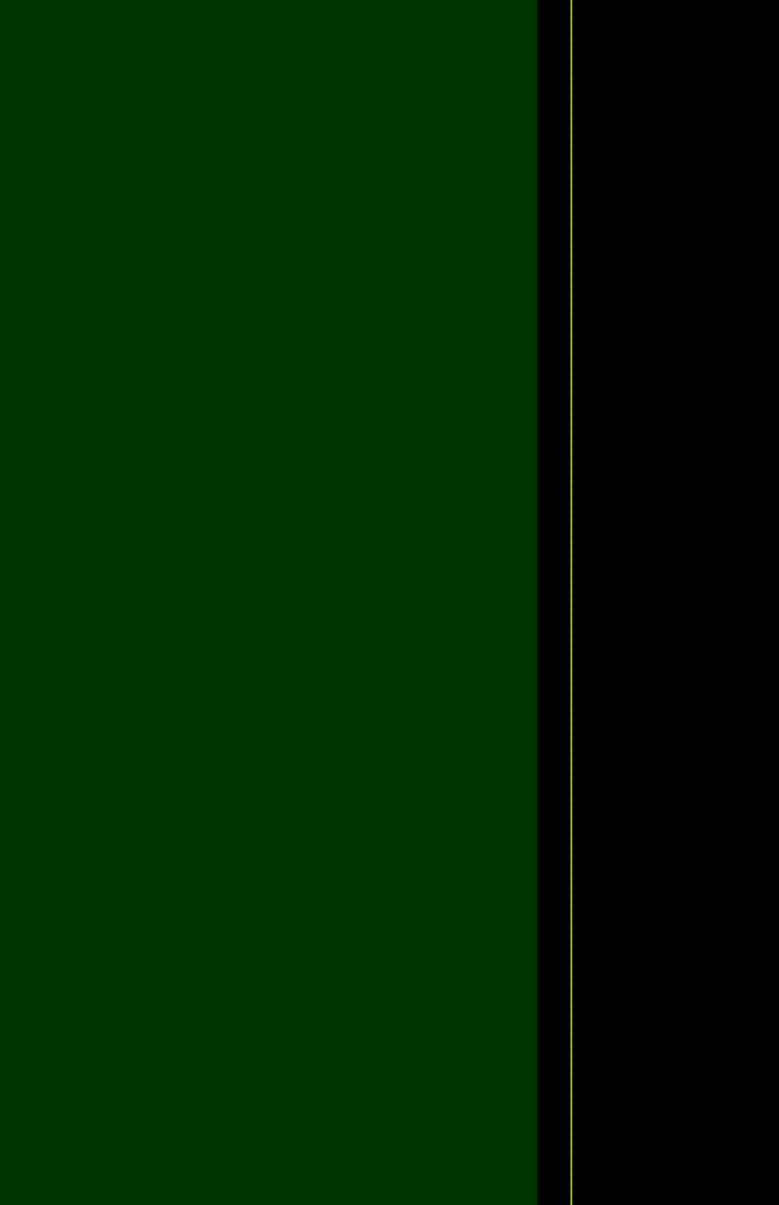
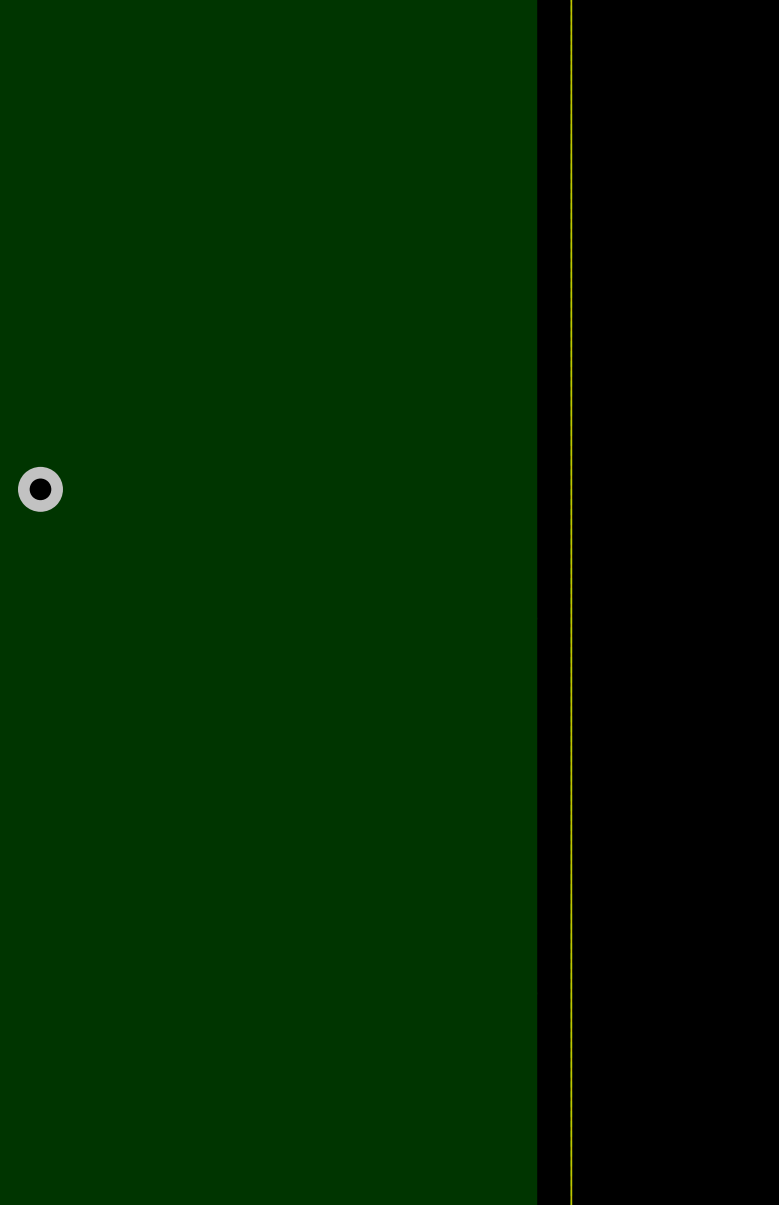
via: none -> (40, 489)

